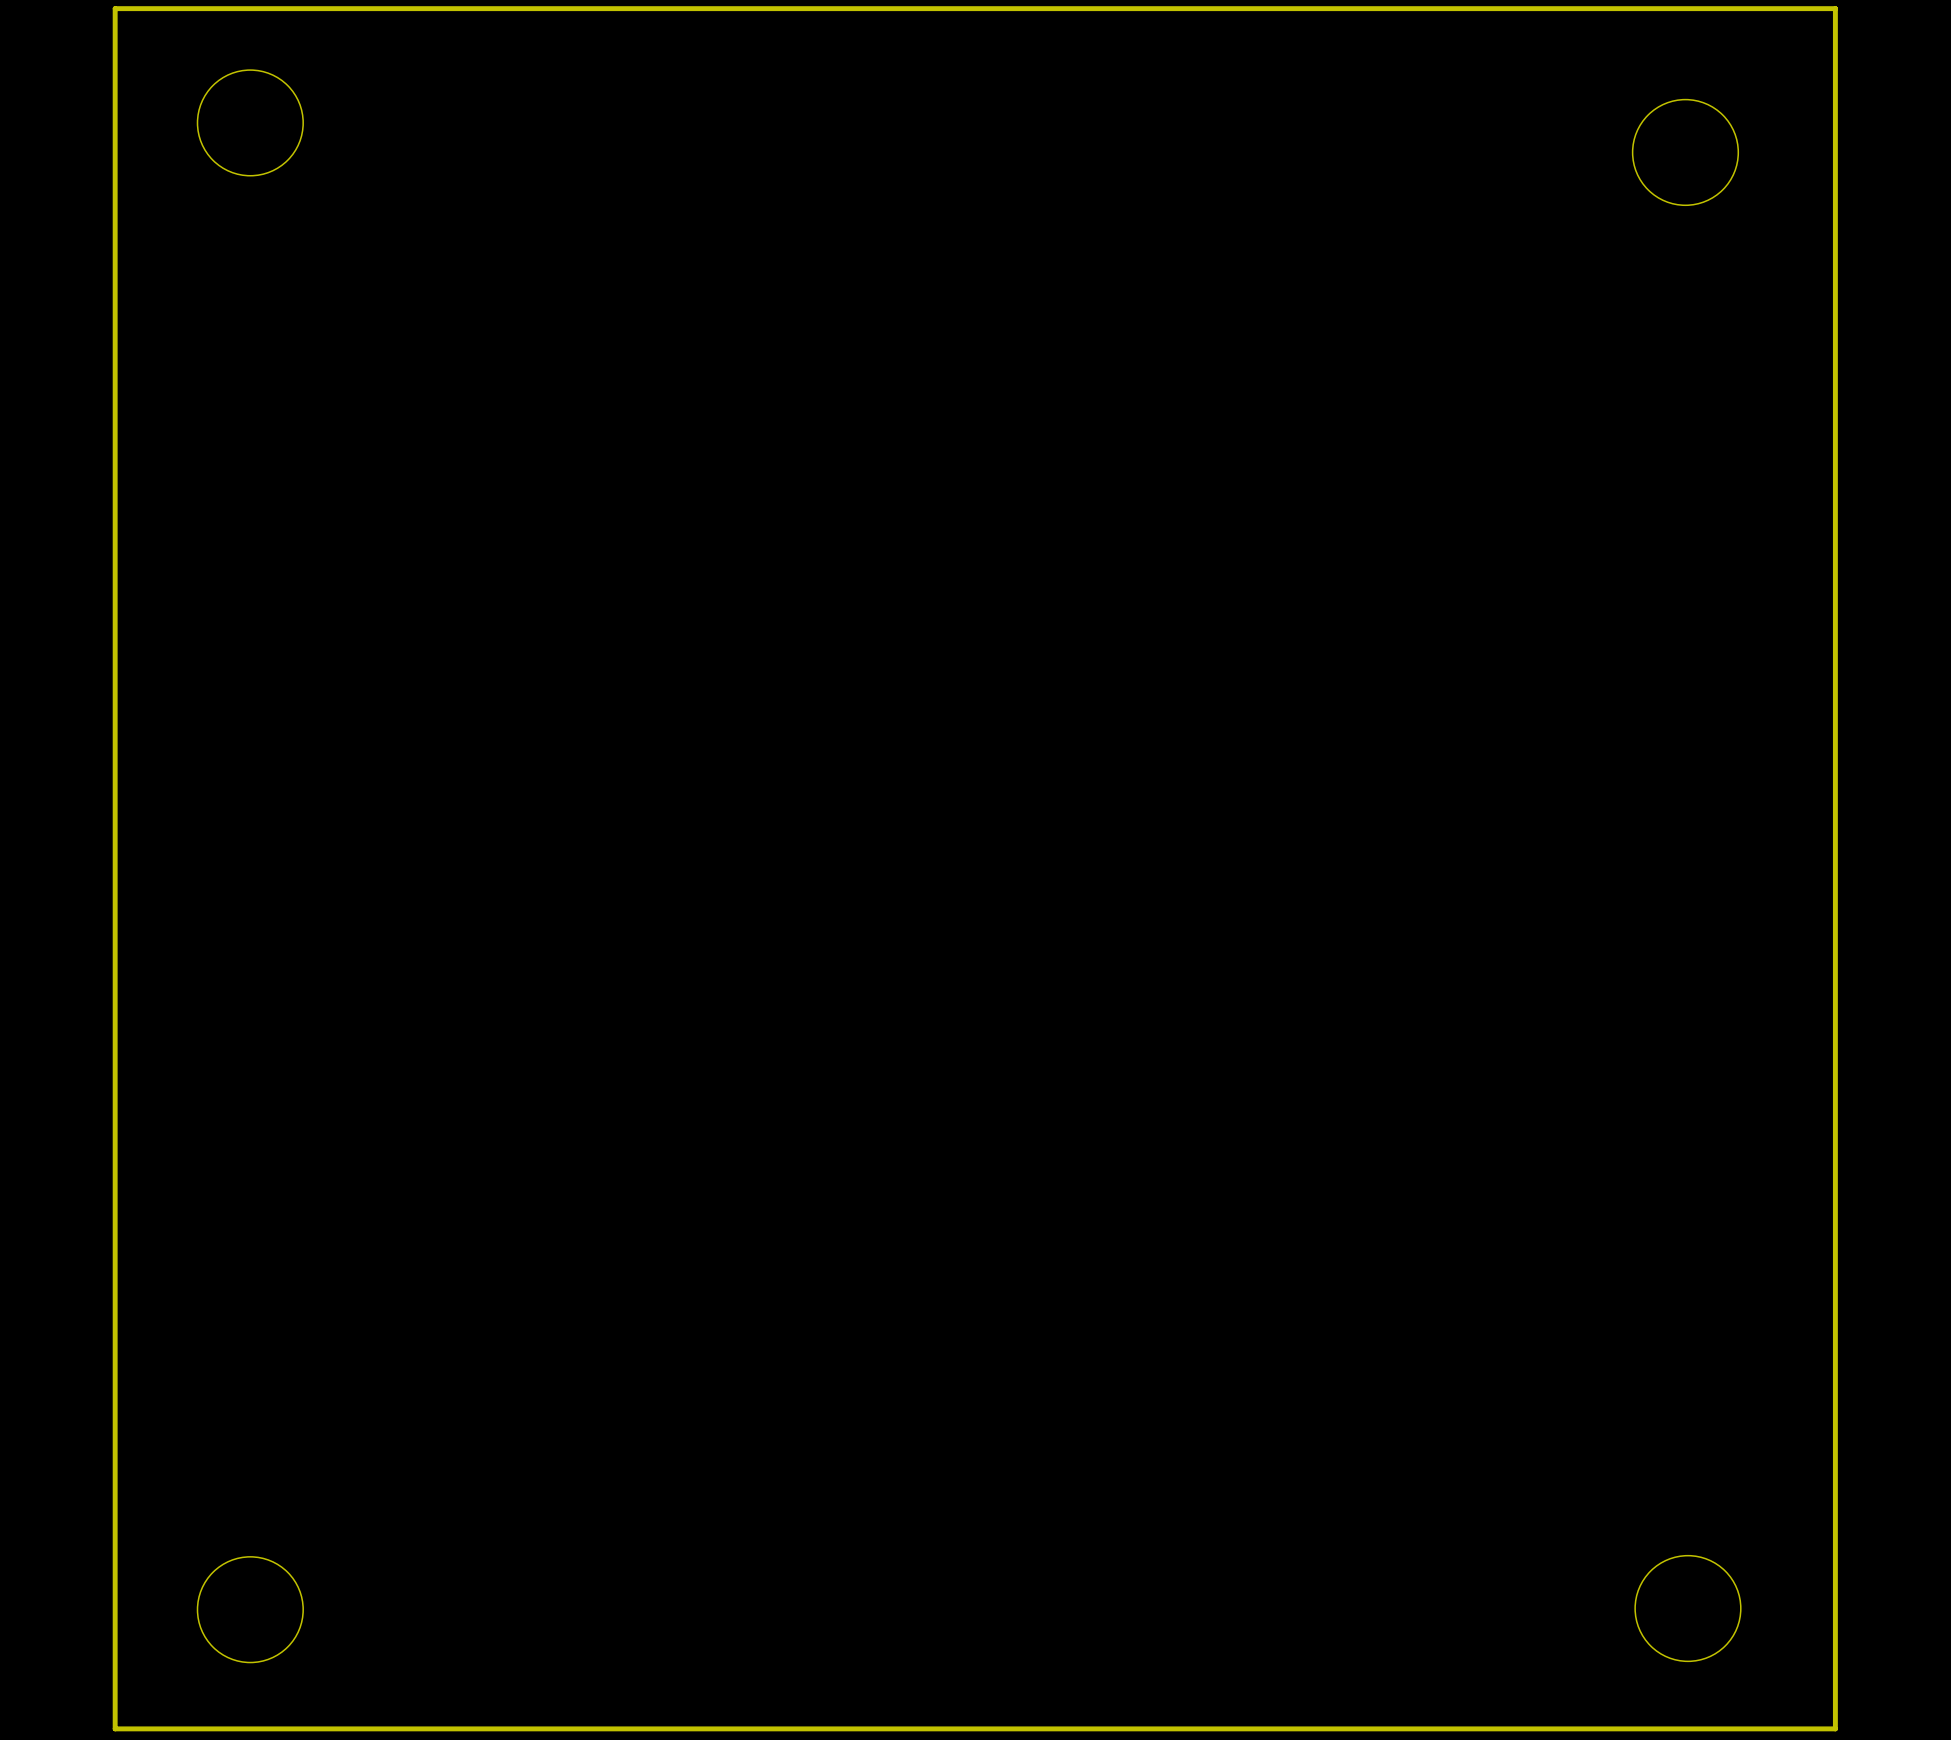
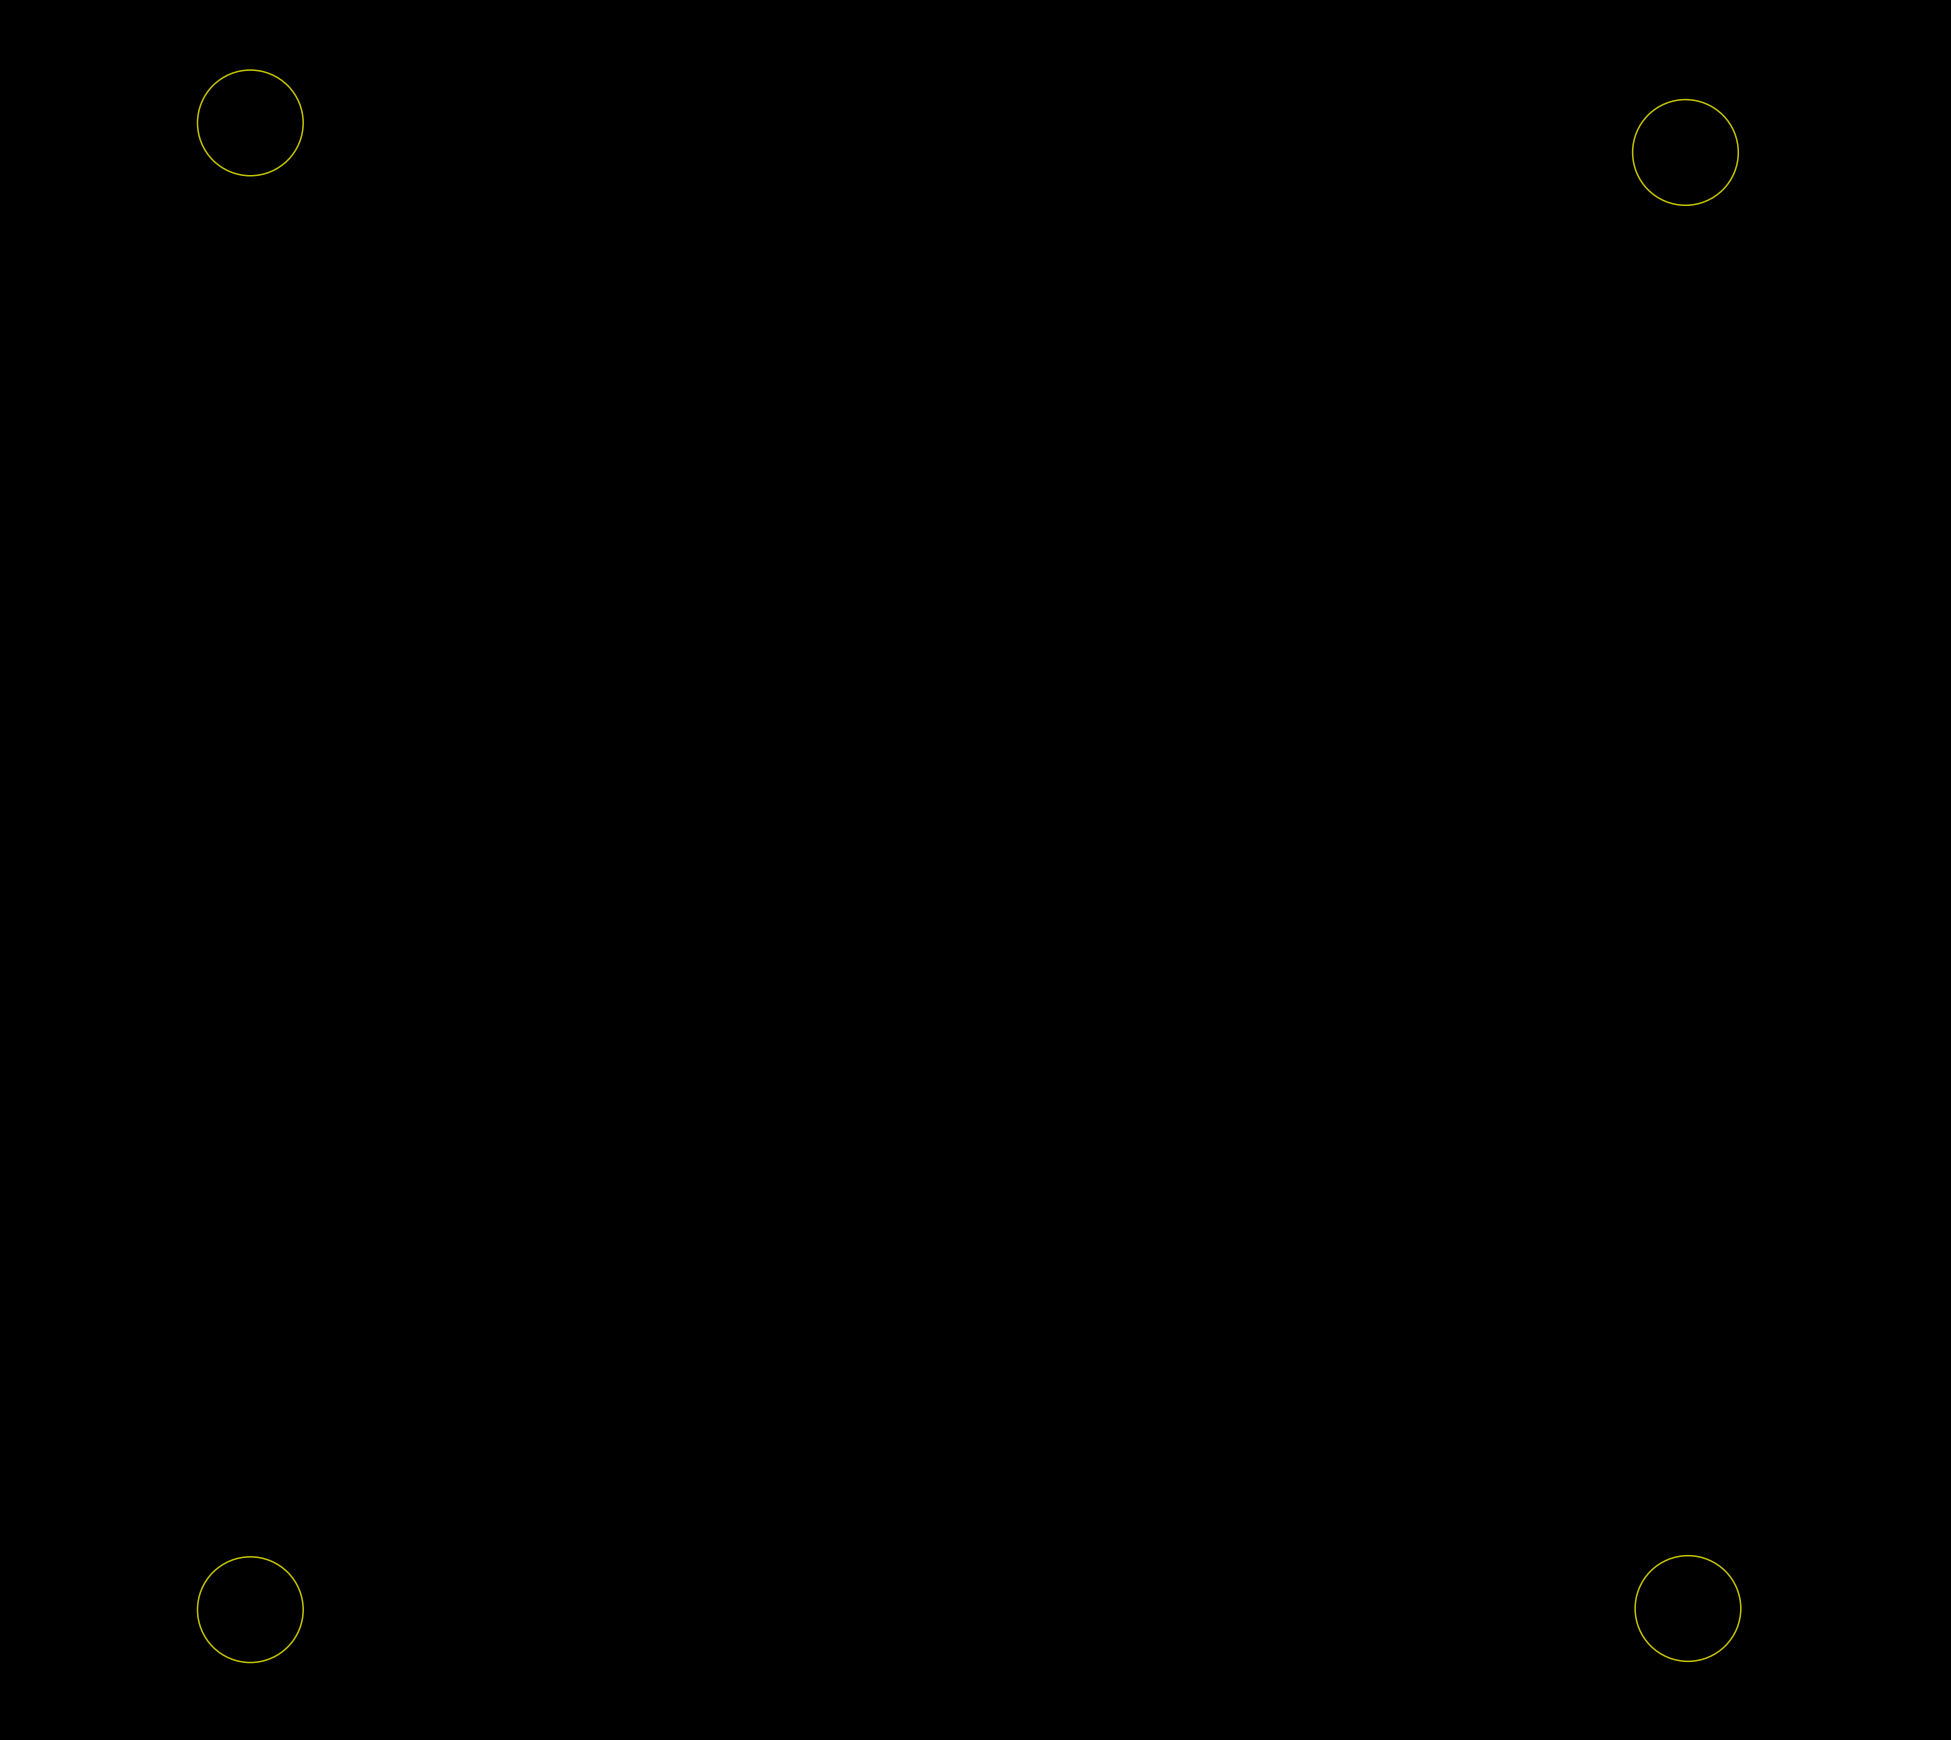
board edge: (1835, 8) (1835, 1728) (115, 1728) (115, 8) (1835, 8) -> none

